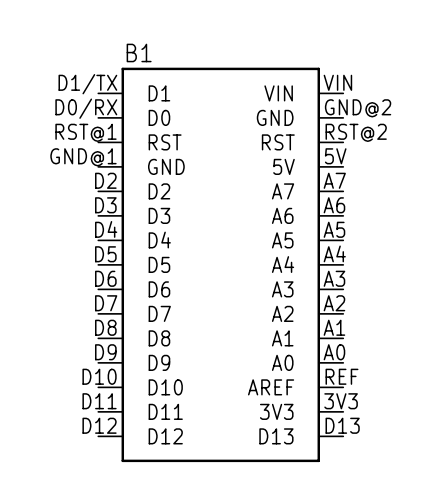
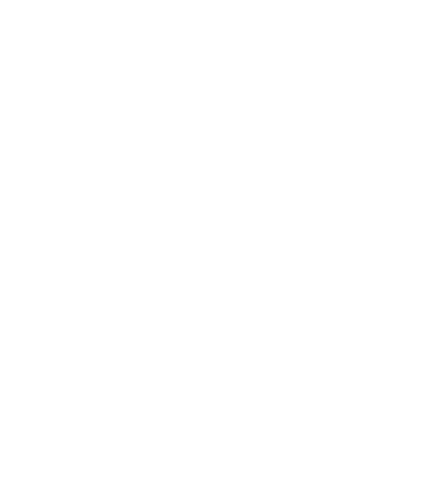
B1: (220, 264) -> none

